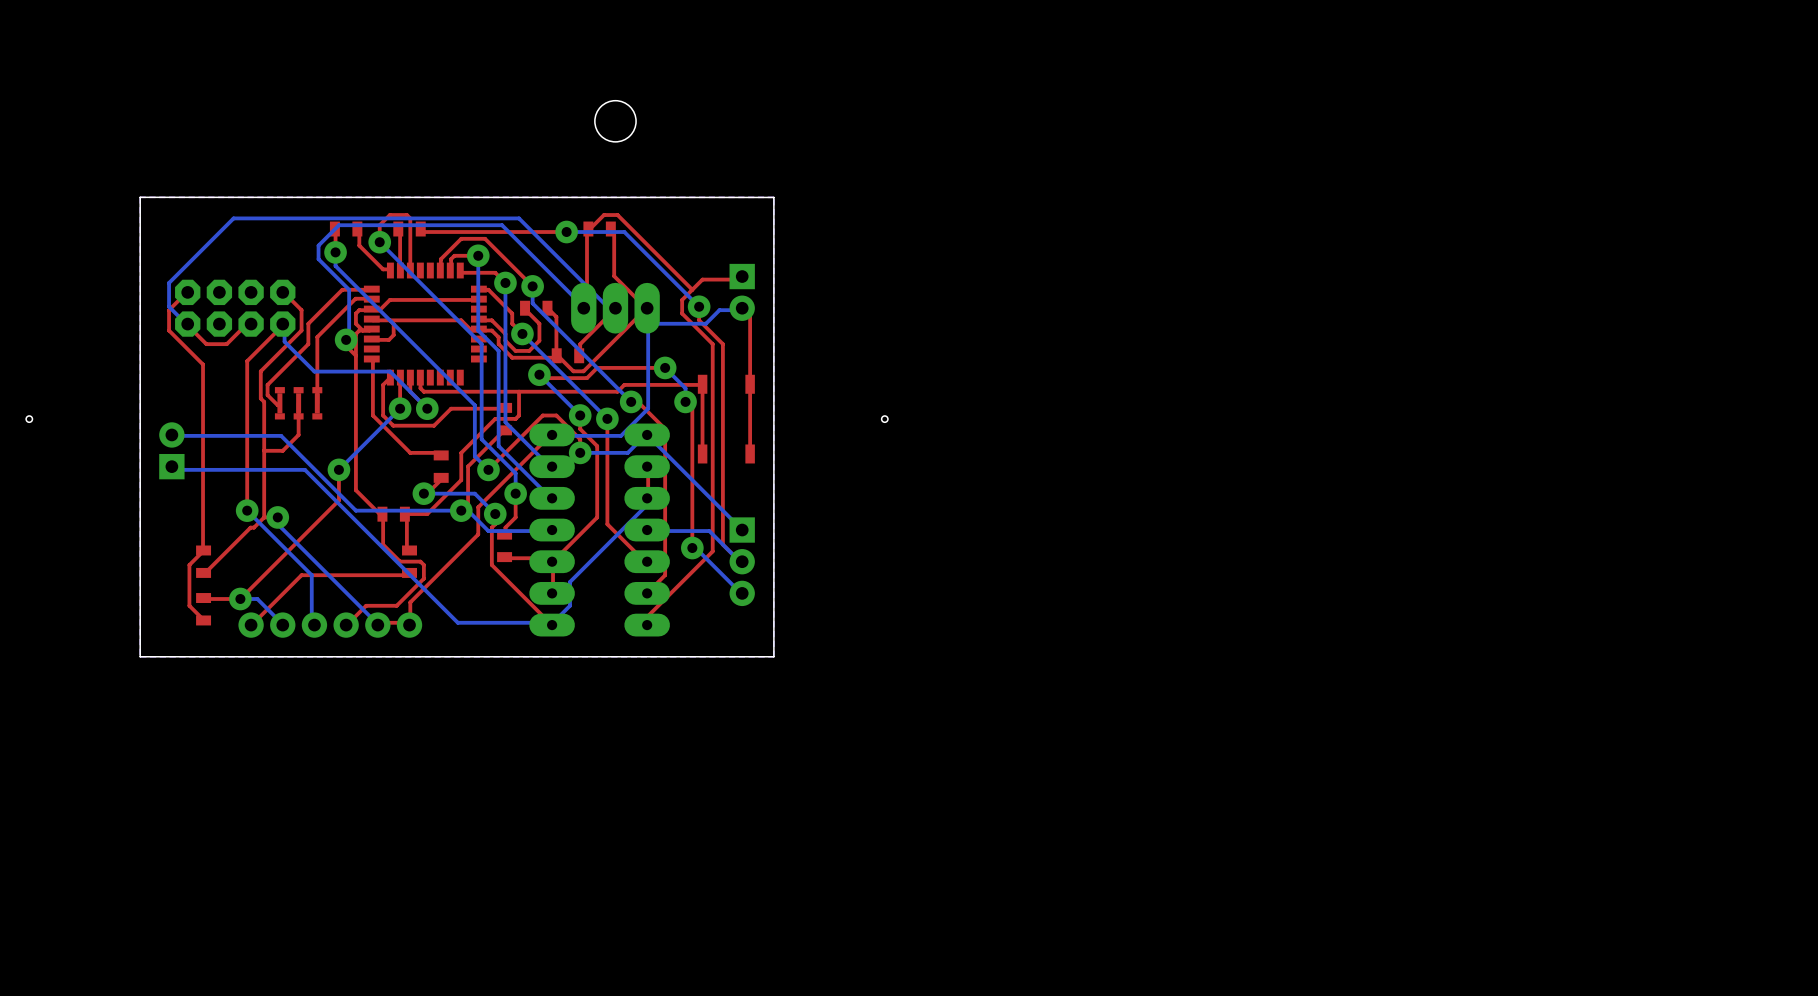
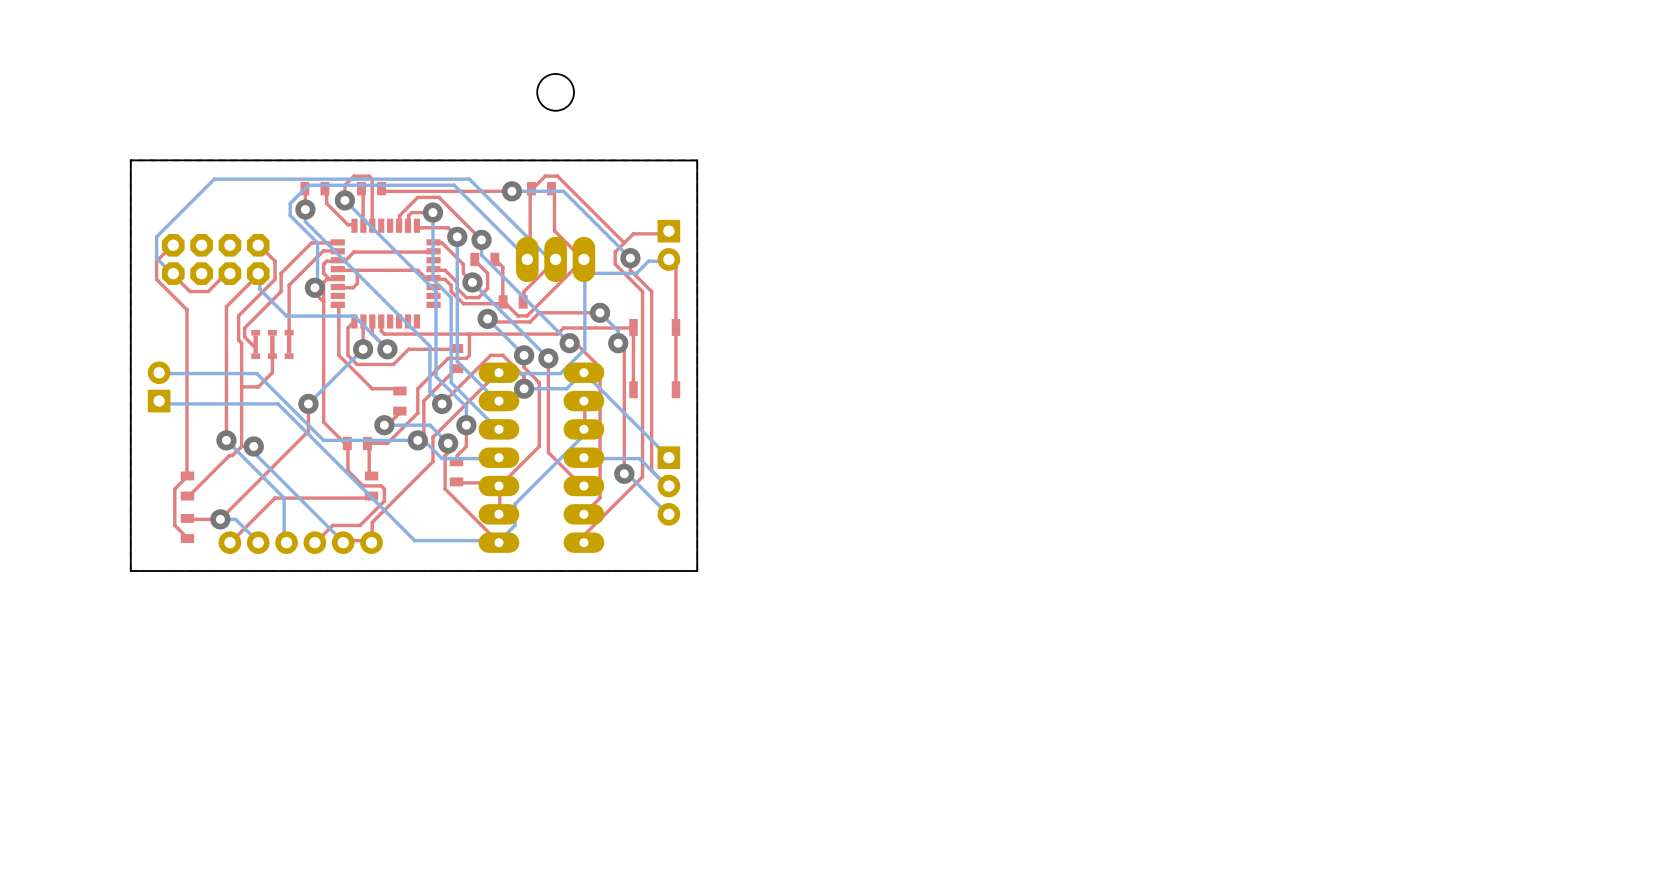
hole: (29, 419) -> none
hole: (884, 419) -> none

